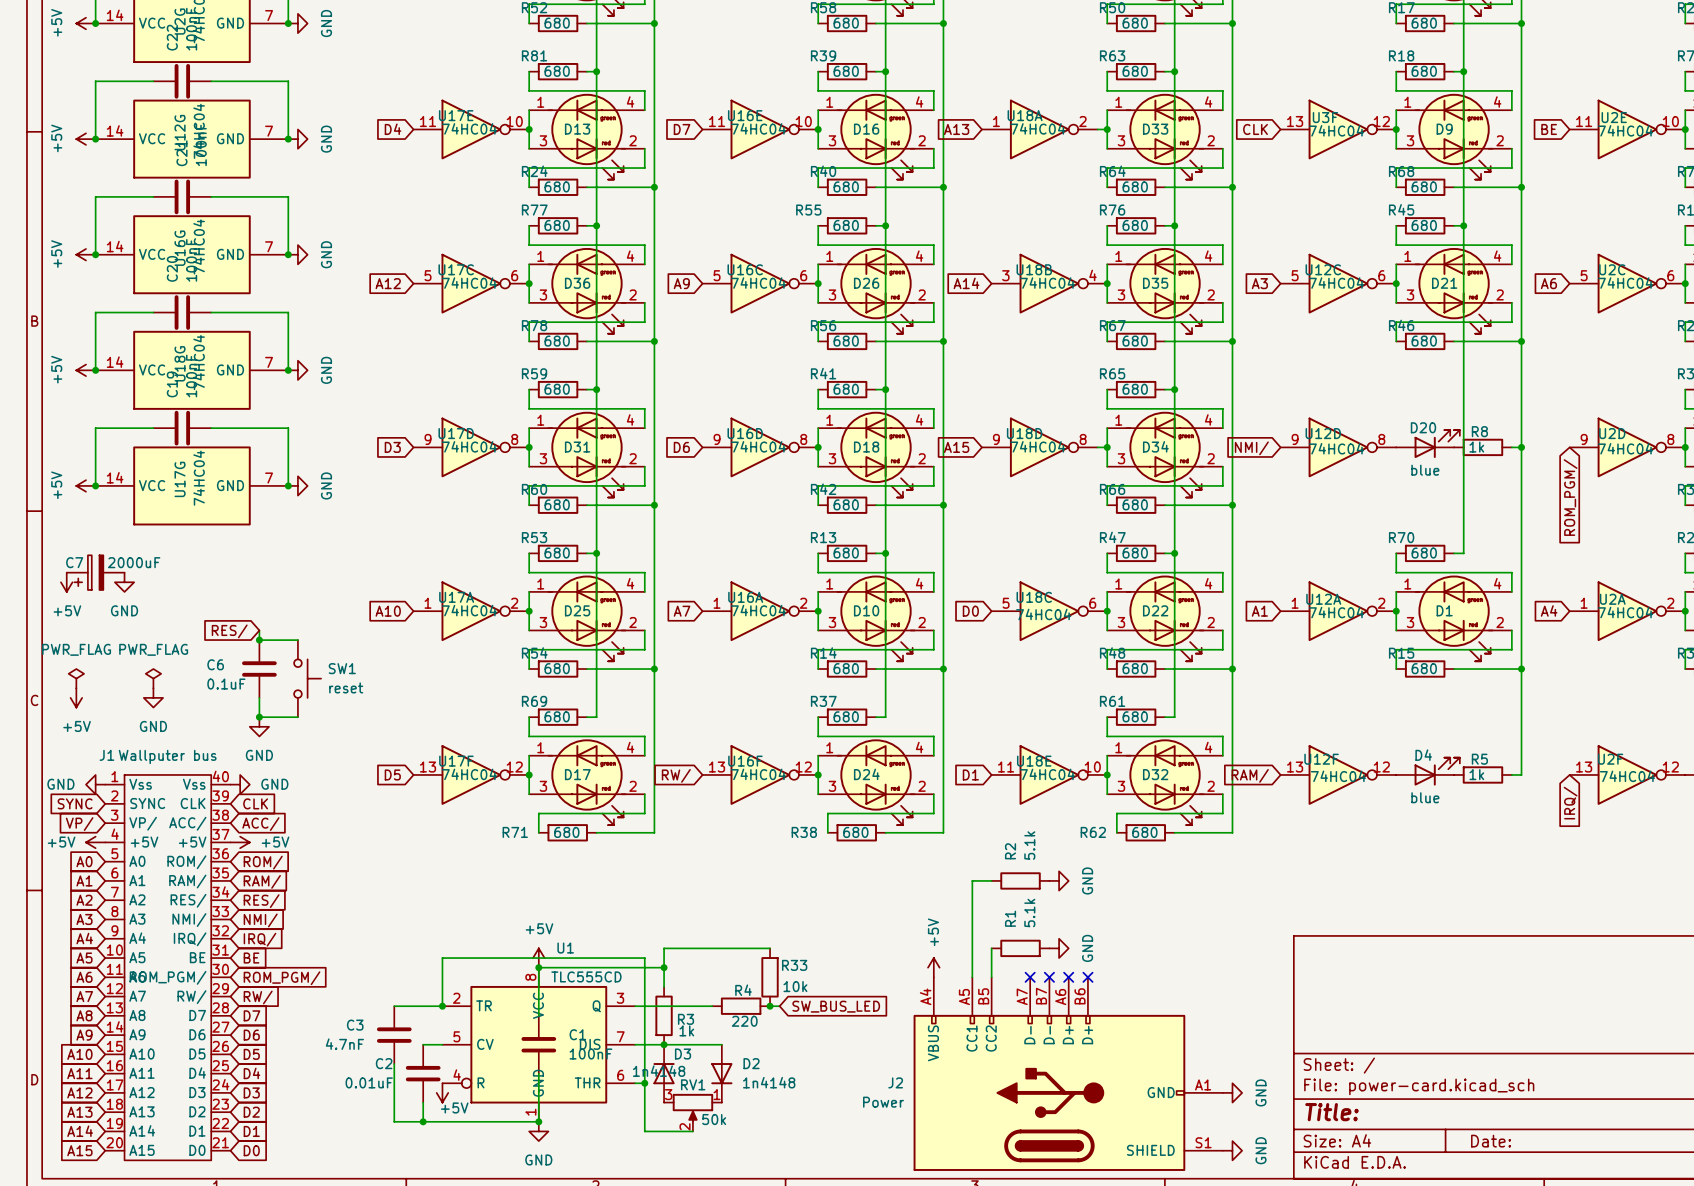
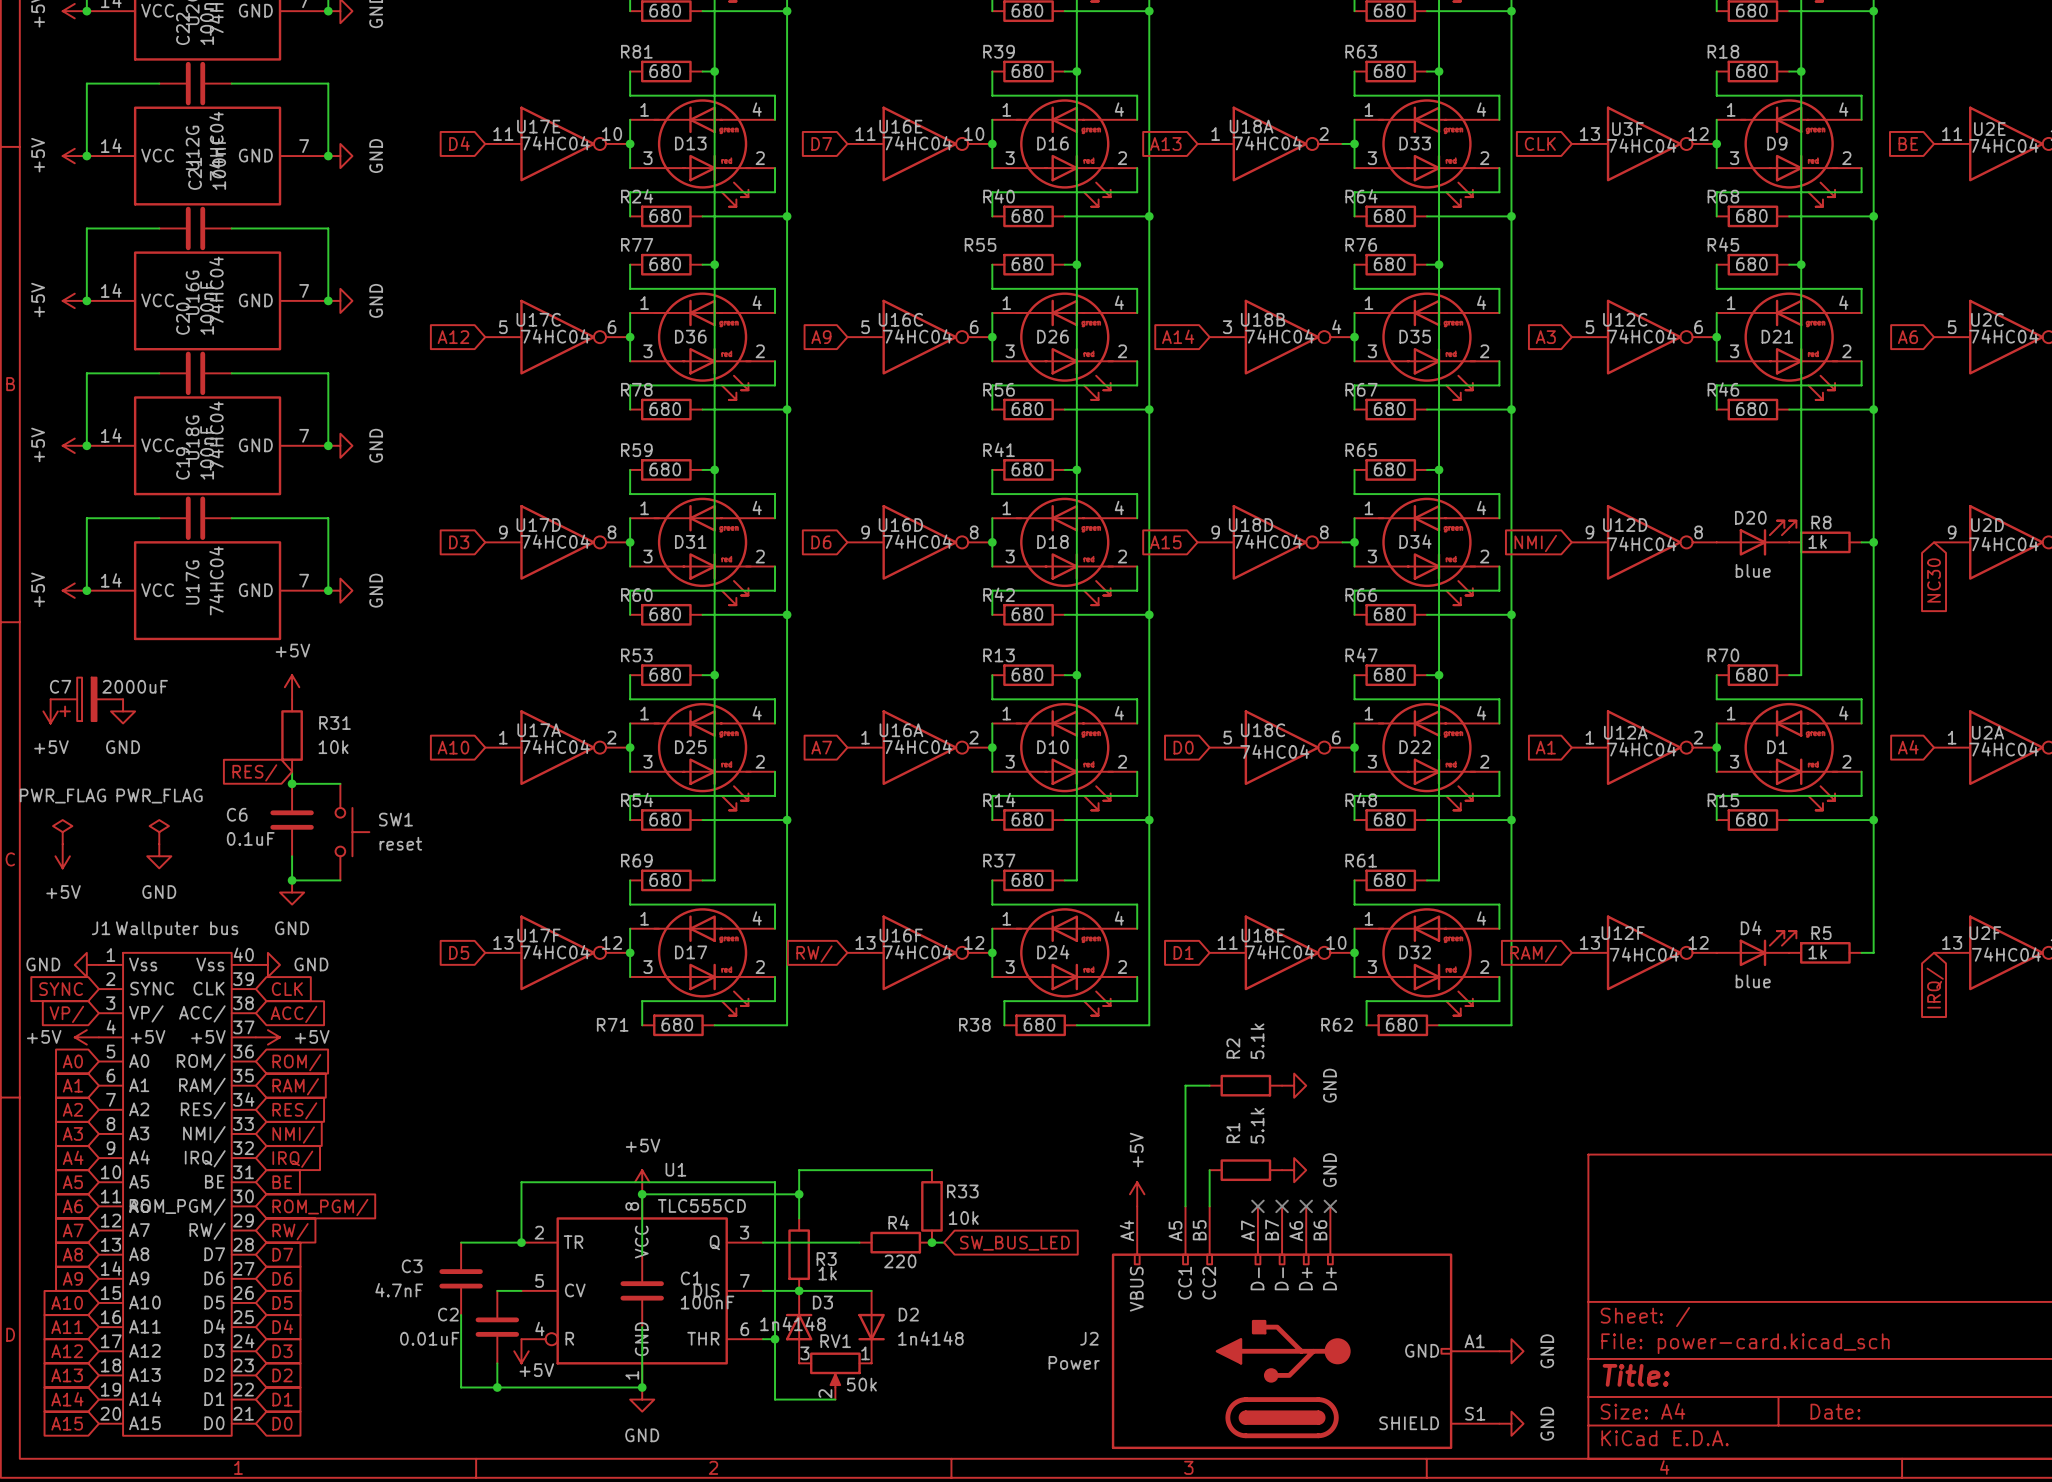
global label: ROM_PGM/ (1570, 497) -> NC30 (1934, 580)
power symbol: none -> +5V (292, 687)
R31: none -> 10k (292, 735)

